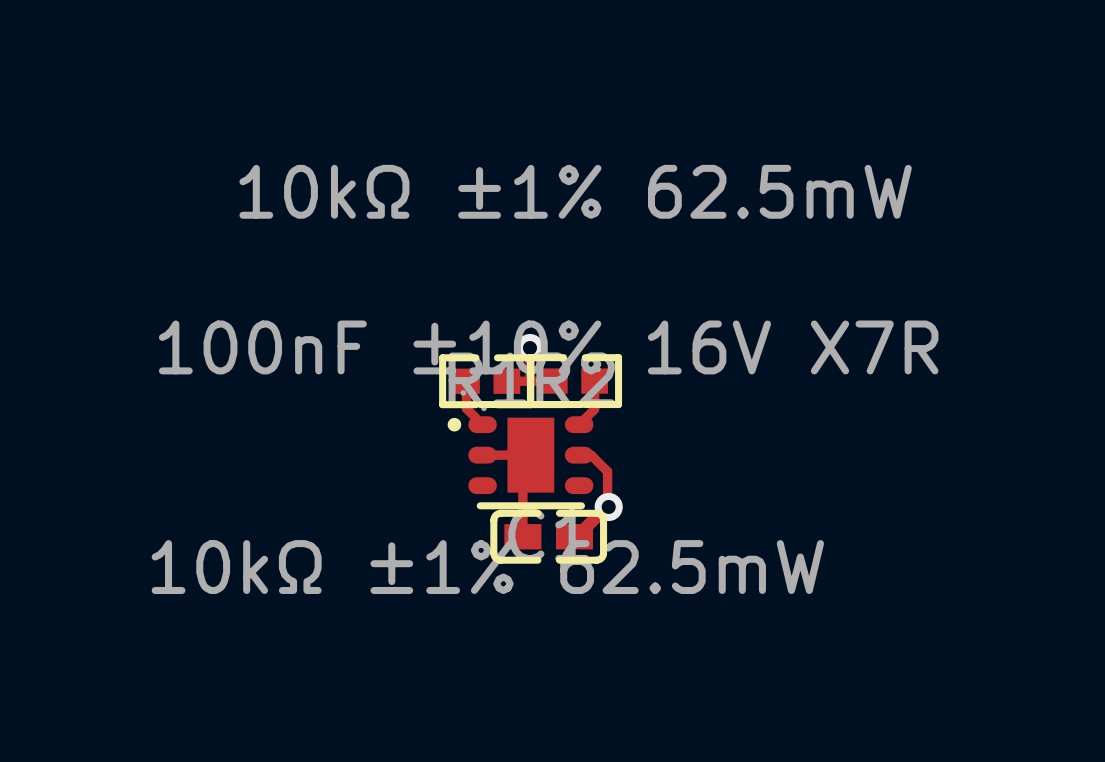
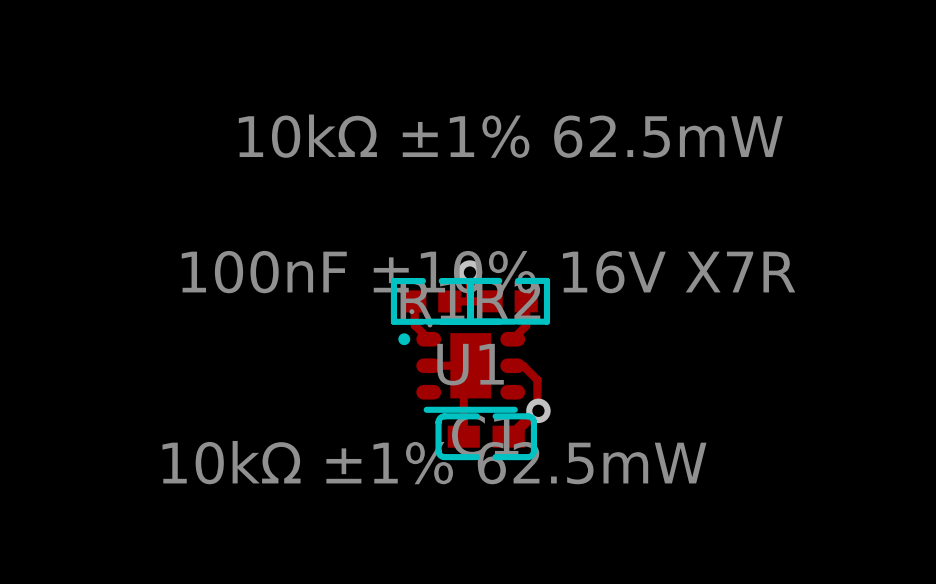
U1 name: none -> U1 (470, 364)

